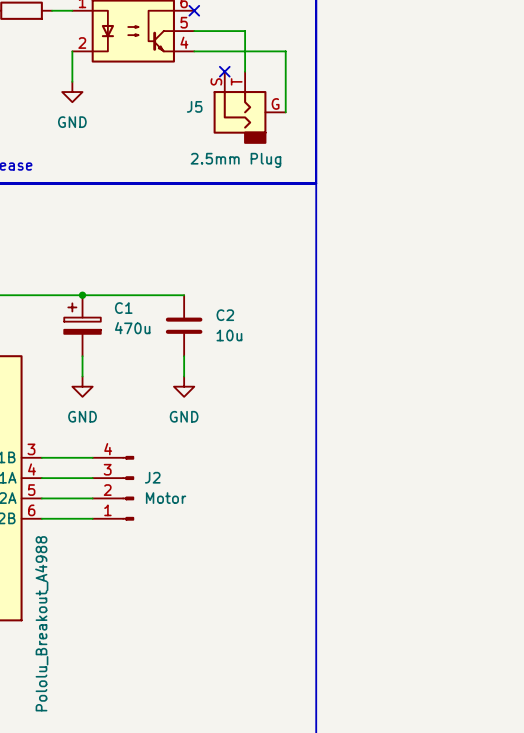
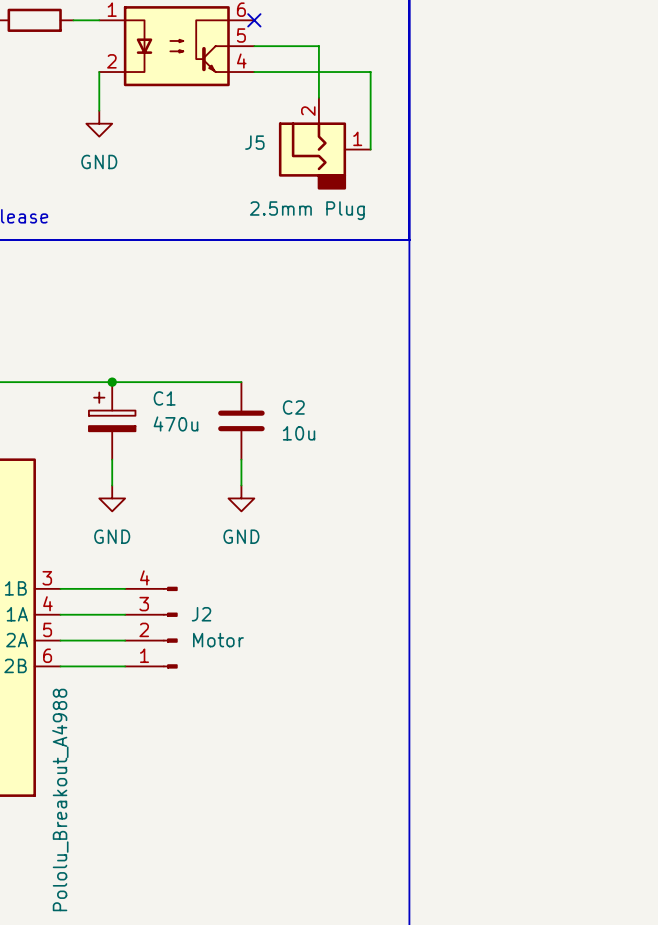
J5 symbol: [213, 71, 286, 144] -> [278, 97, 371, 190]
no-connect mark: (224, 71) -> none

